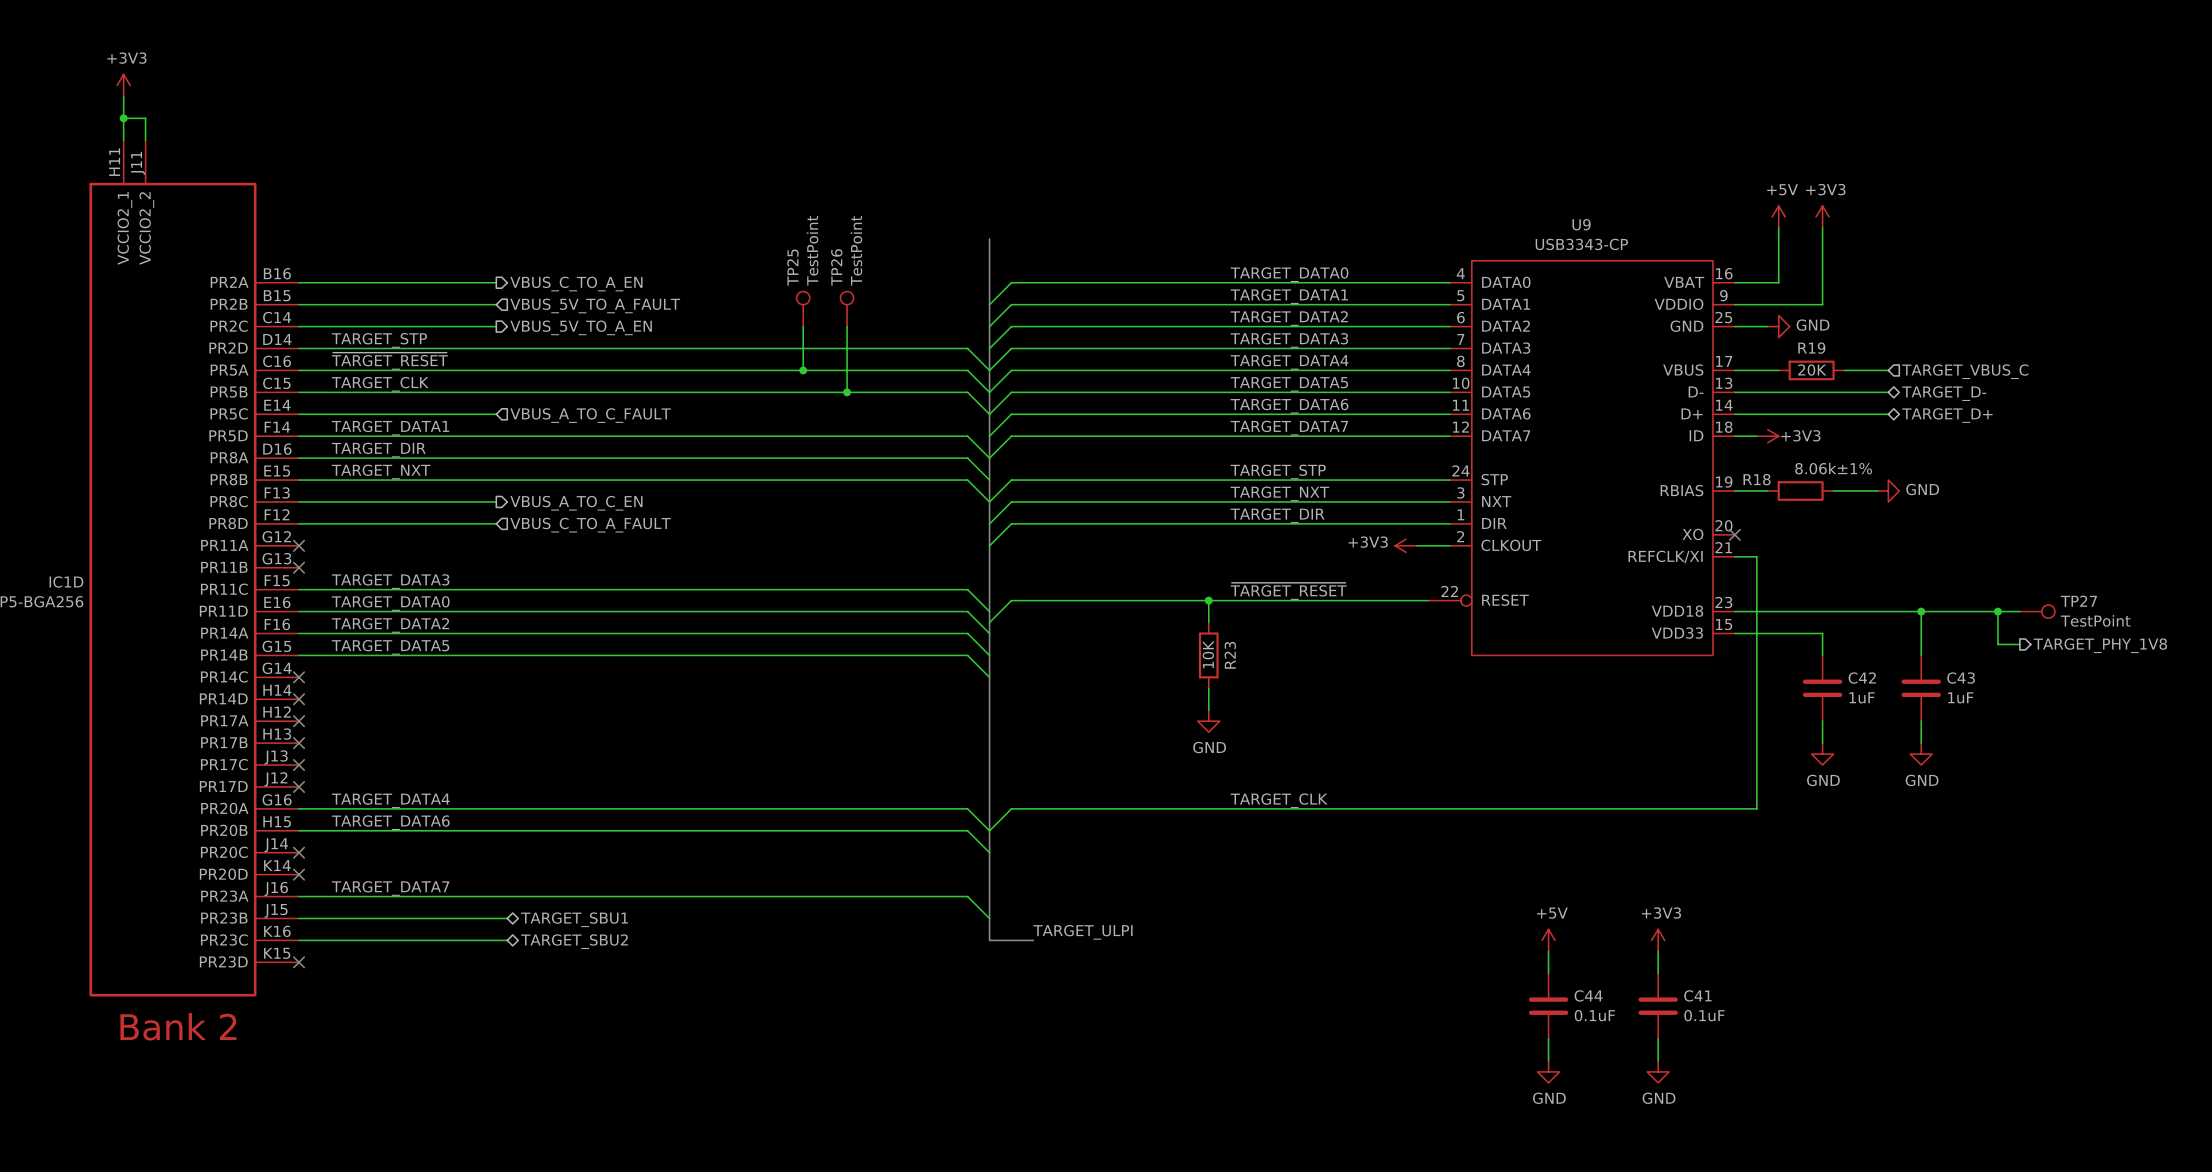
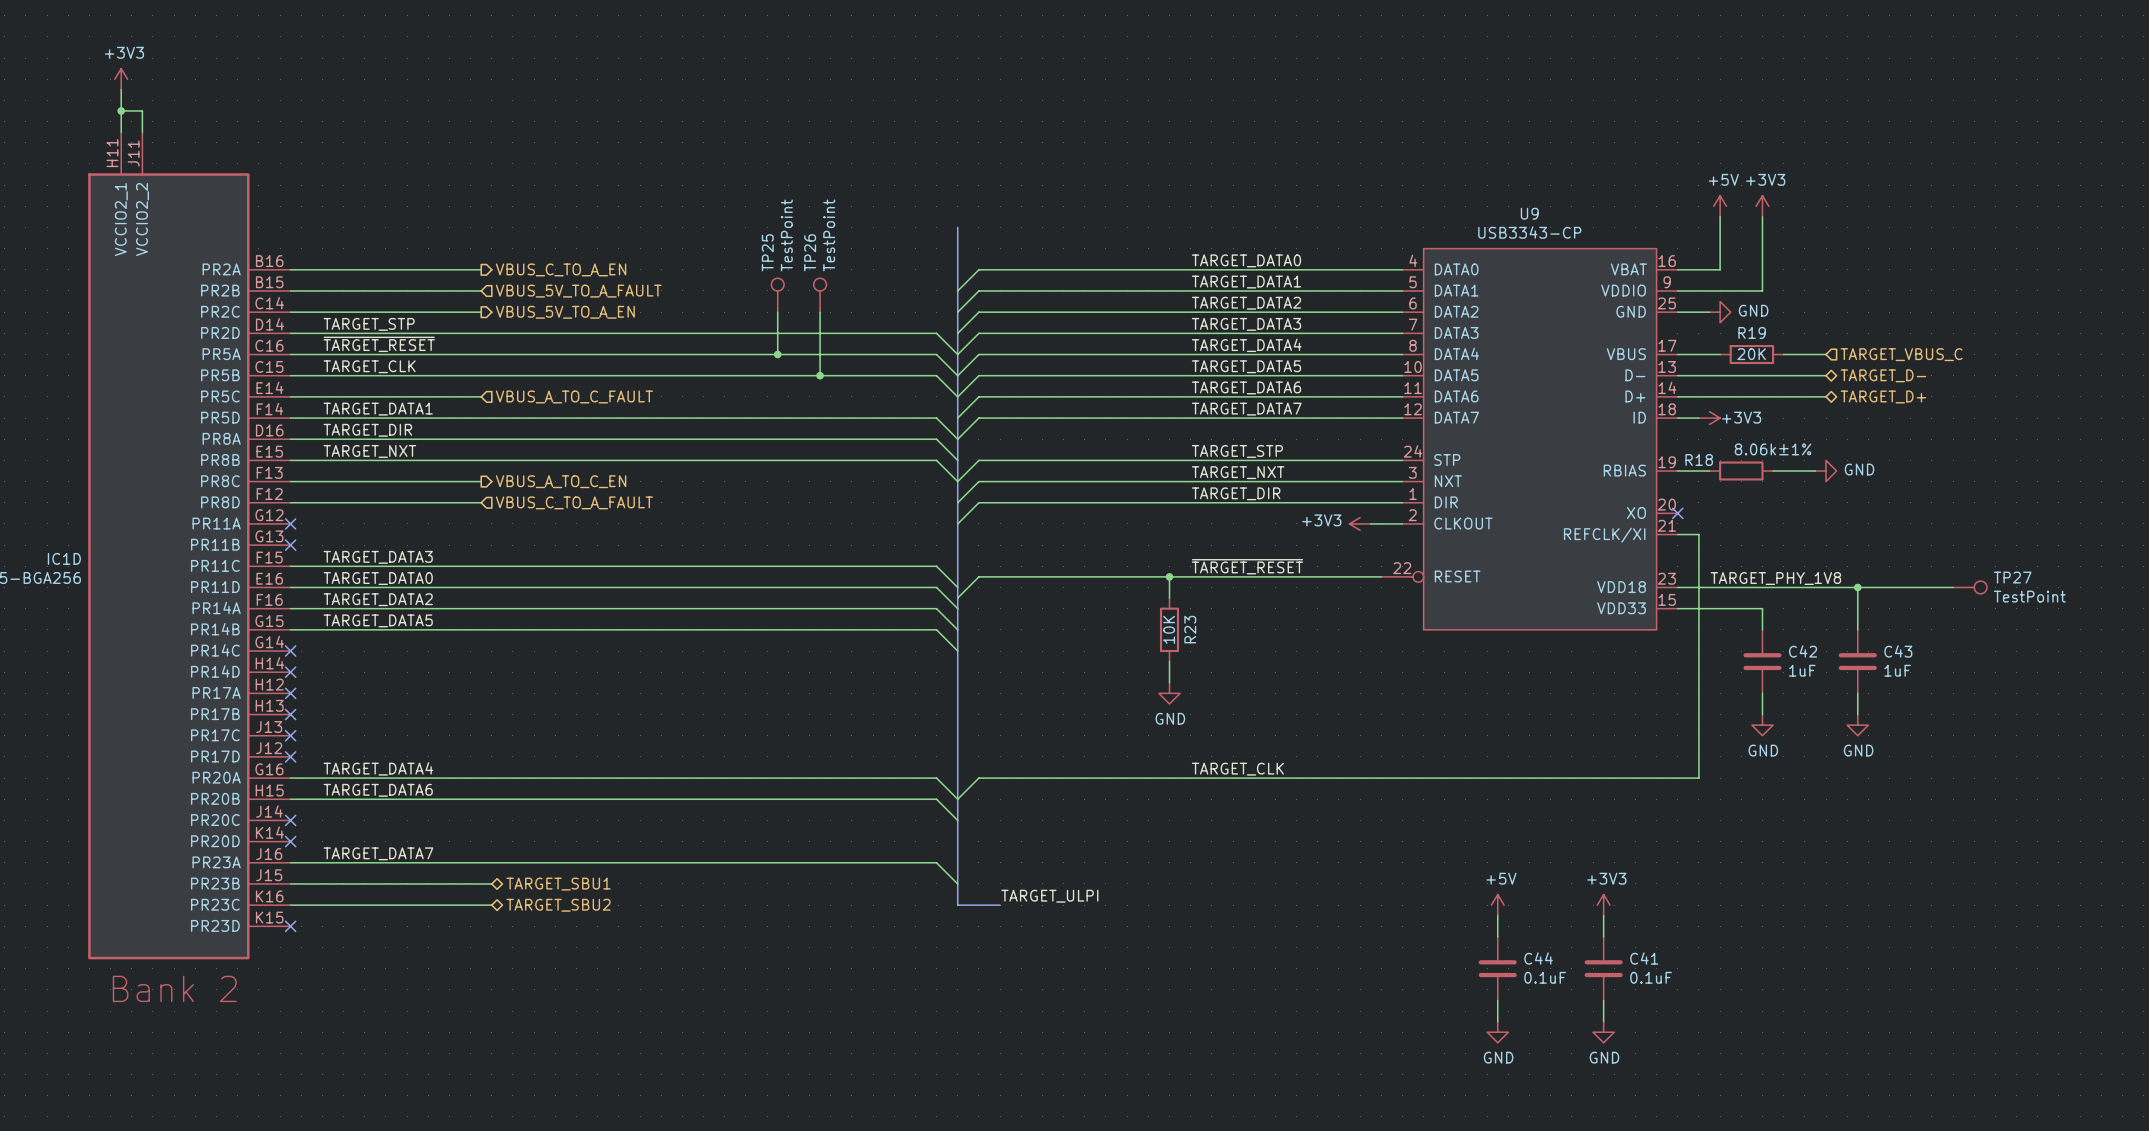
label: none -> TARGET_PHY_1V8 (1775, 578)
wire: (1997, 611) (1997, 644) (2019, 644) -> none
junction: (1997, 611) -> none
hierarchical label: TARGET_PHY_1V8 (2100, 645) -> none

